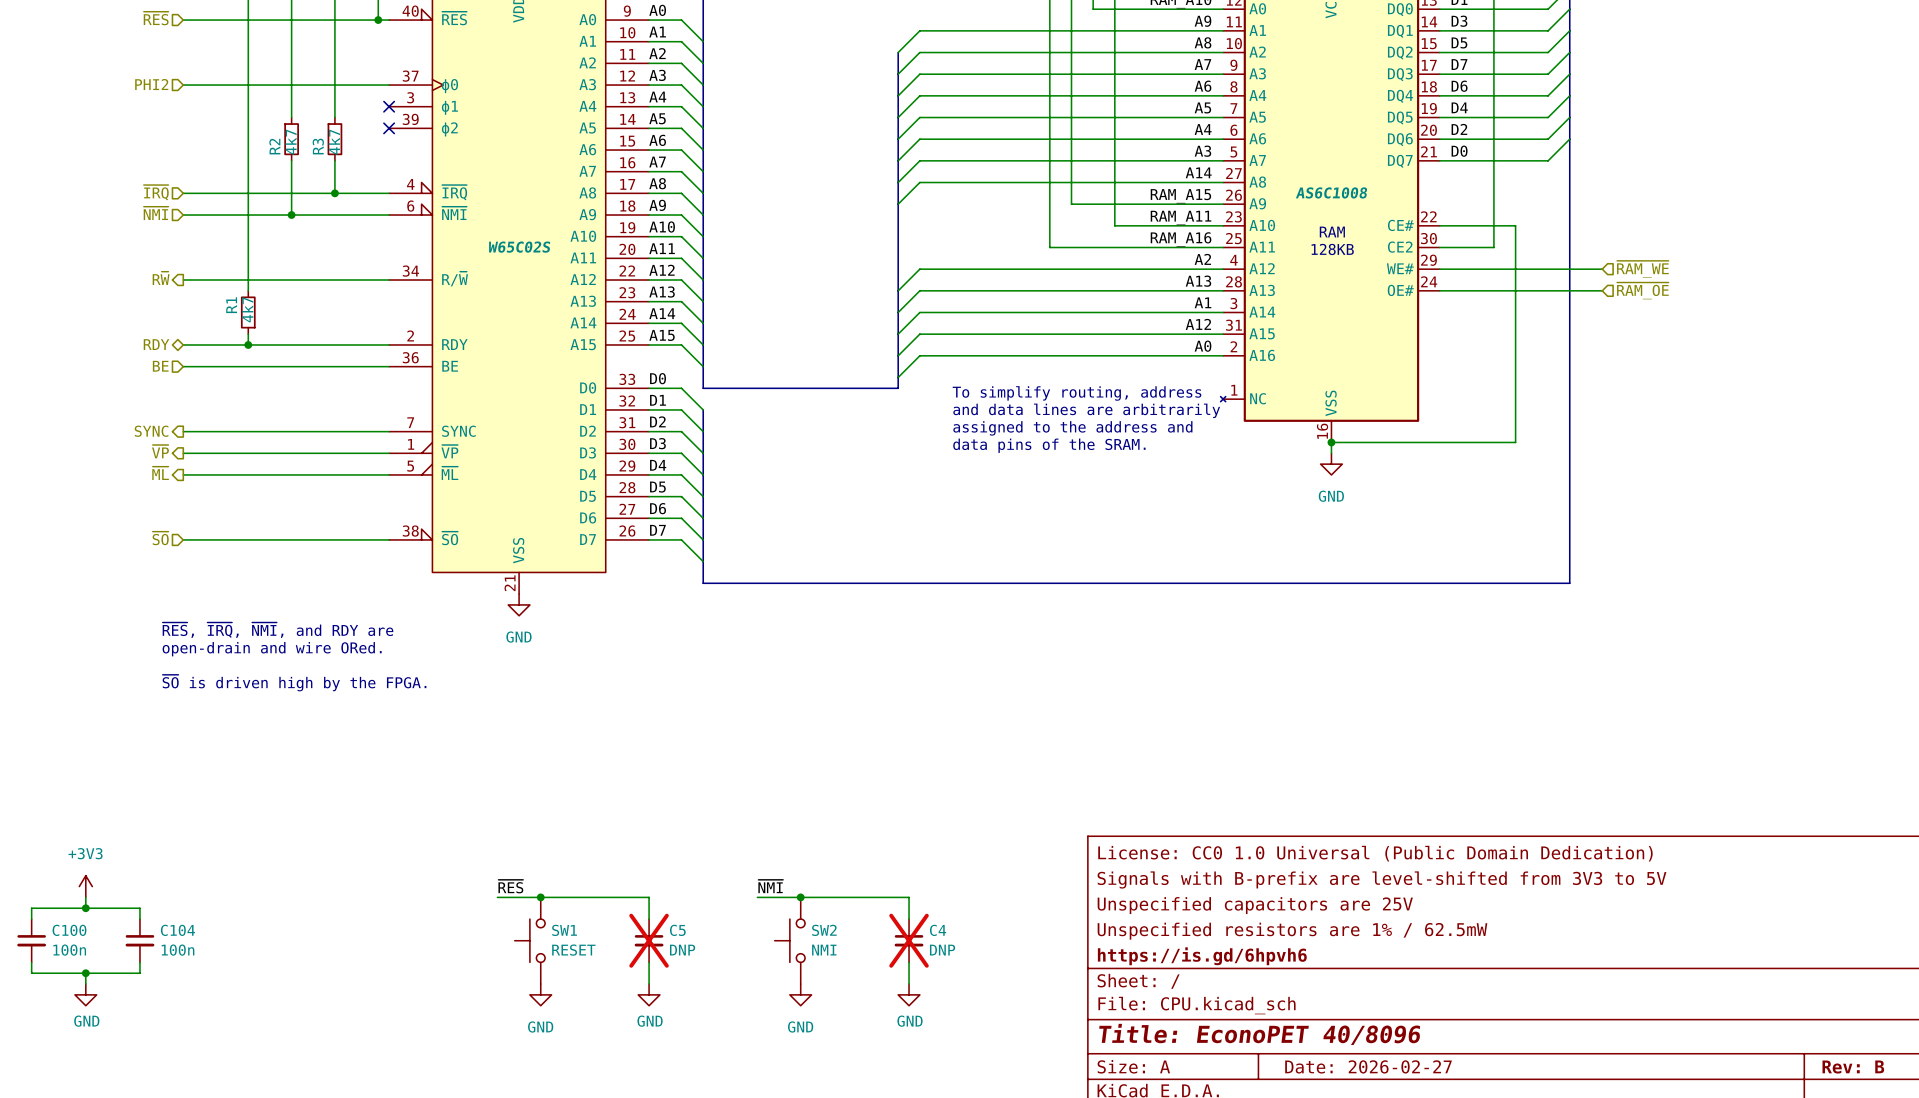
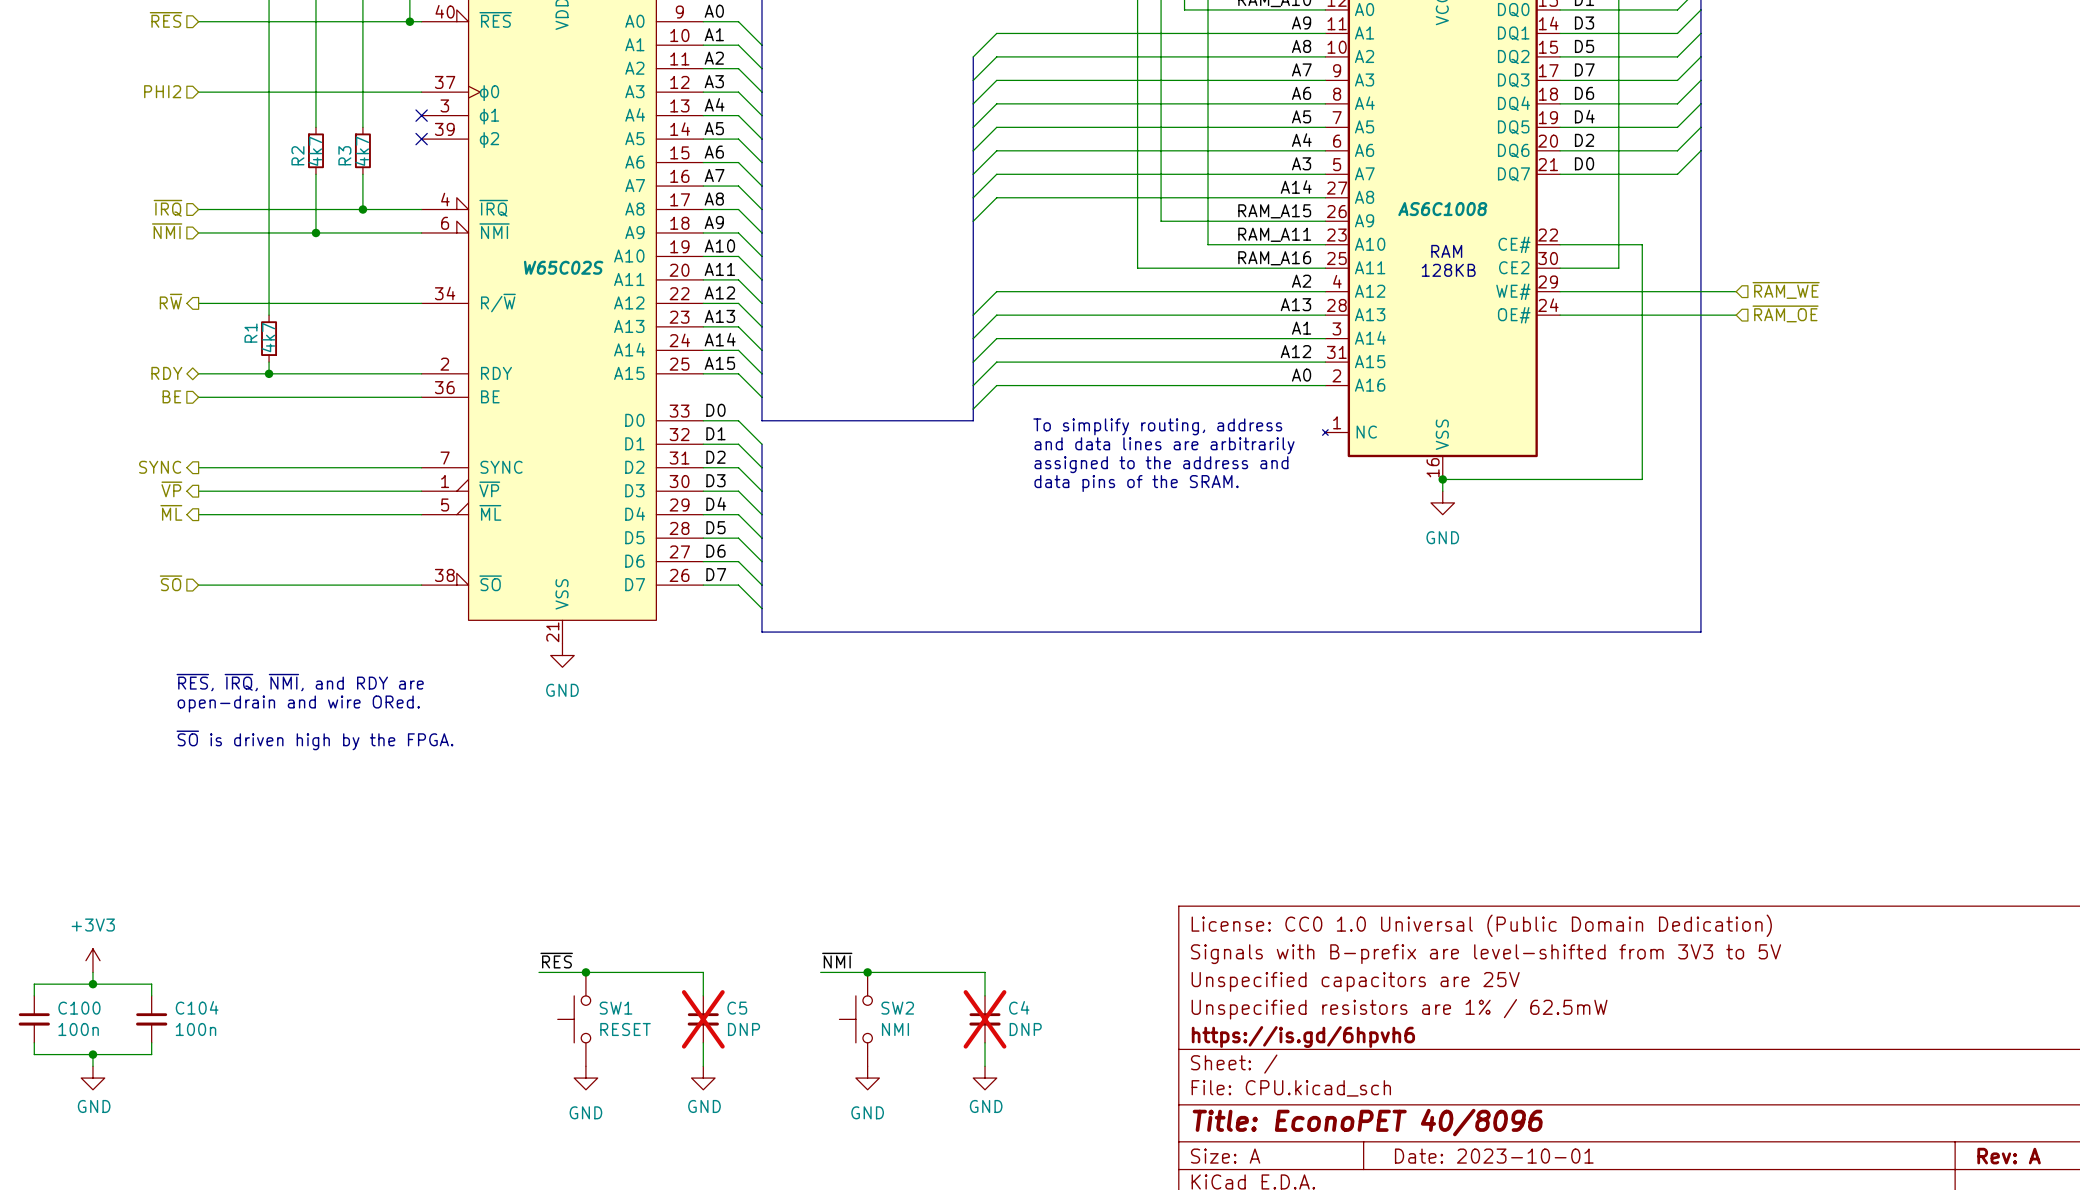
title block: Date: 2026-02-27 (1368, 1066) -> Date: 2023-10-01 (1494, 1156)
title block: Rev: B (1853, 1067) -> Rev: A (2009, 1156)

